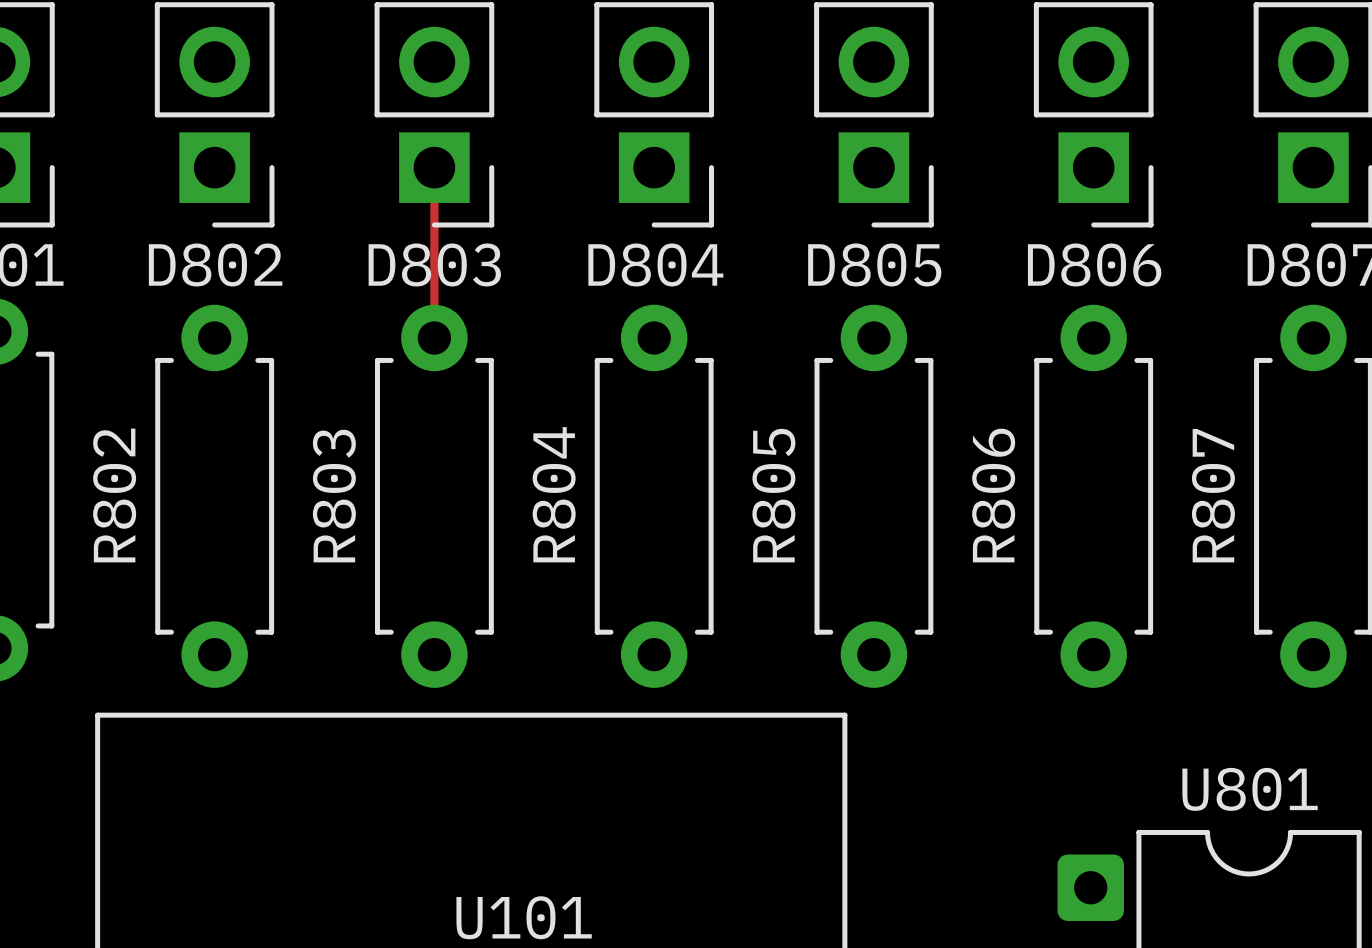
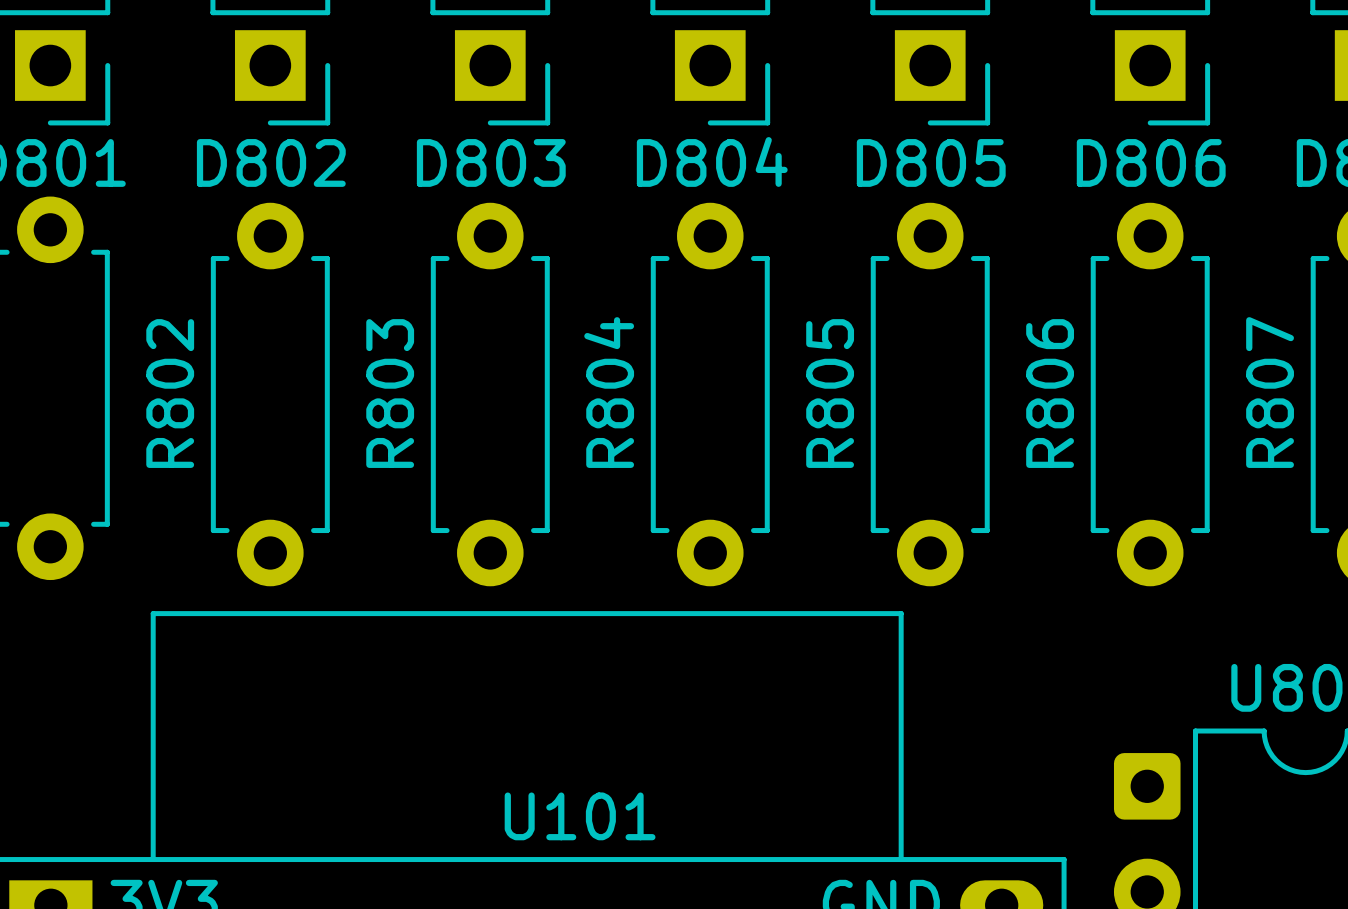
track: (434, 167) (434, 337) -> none

